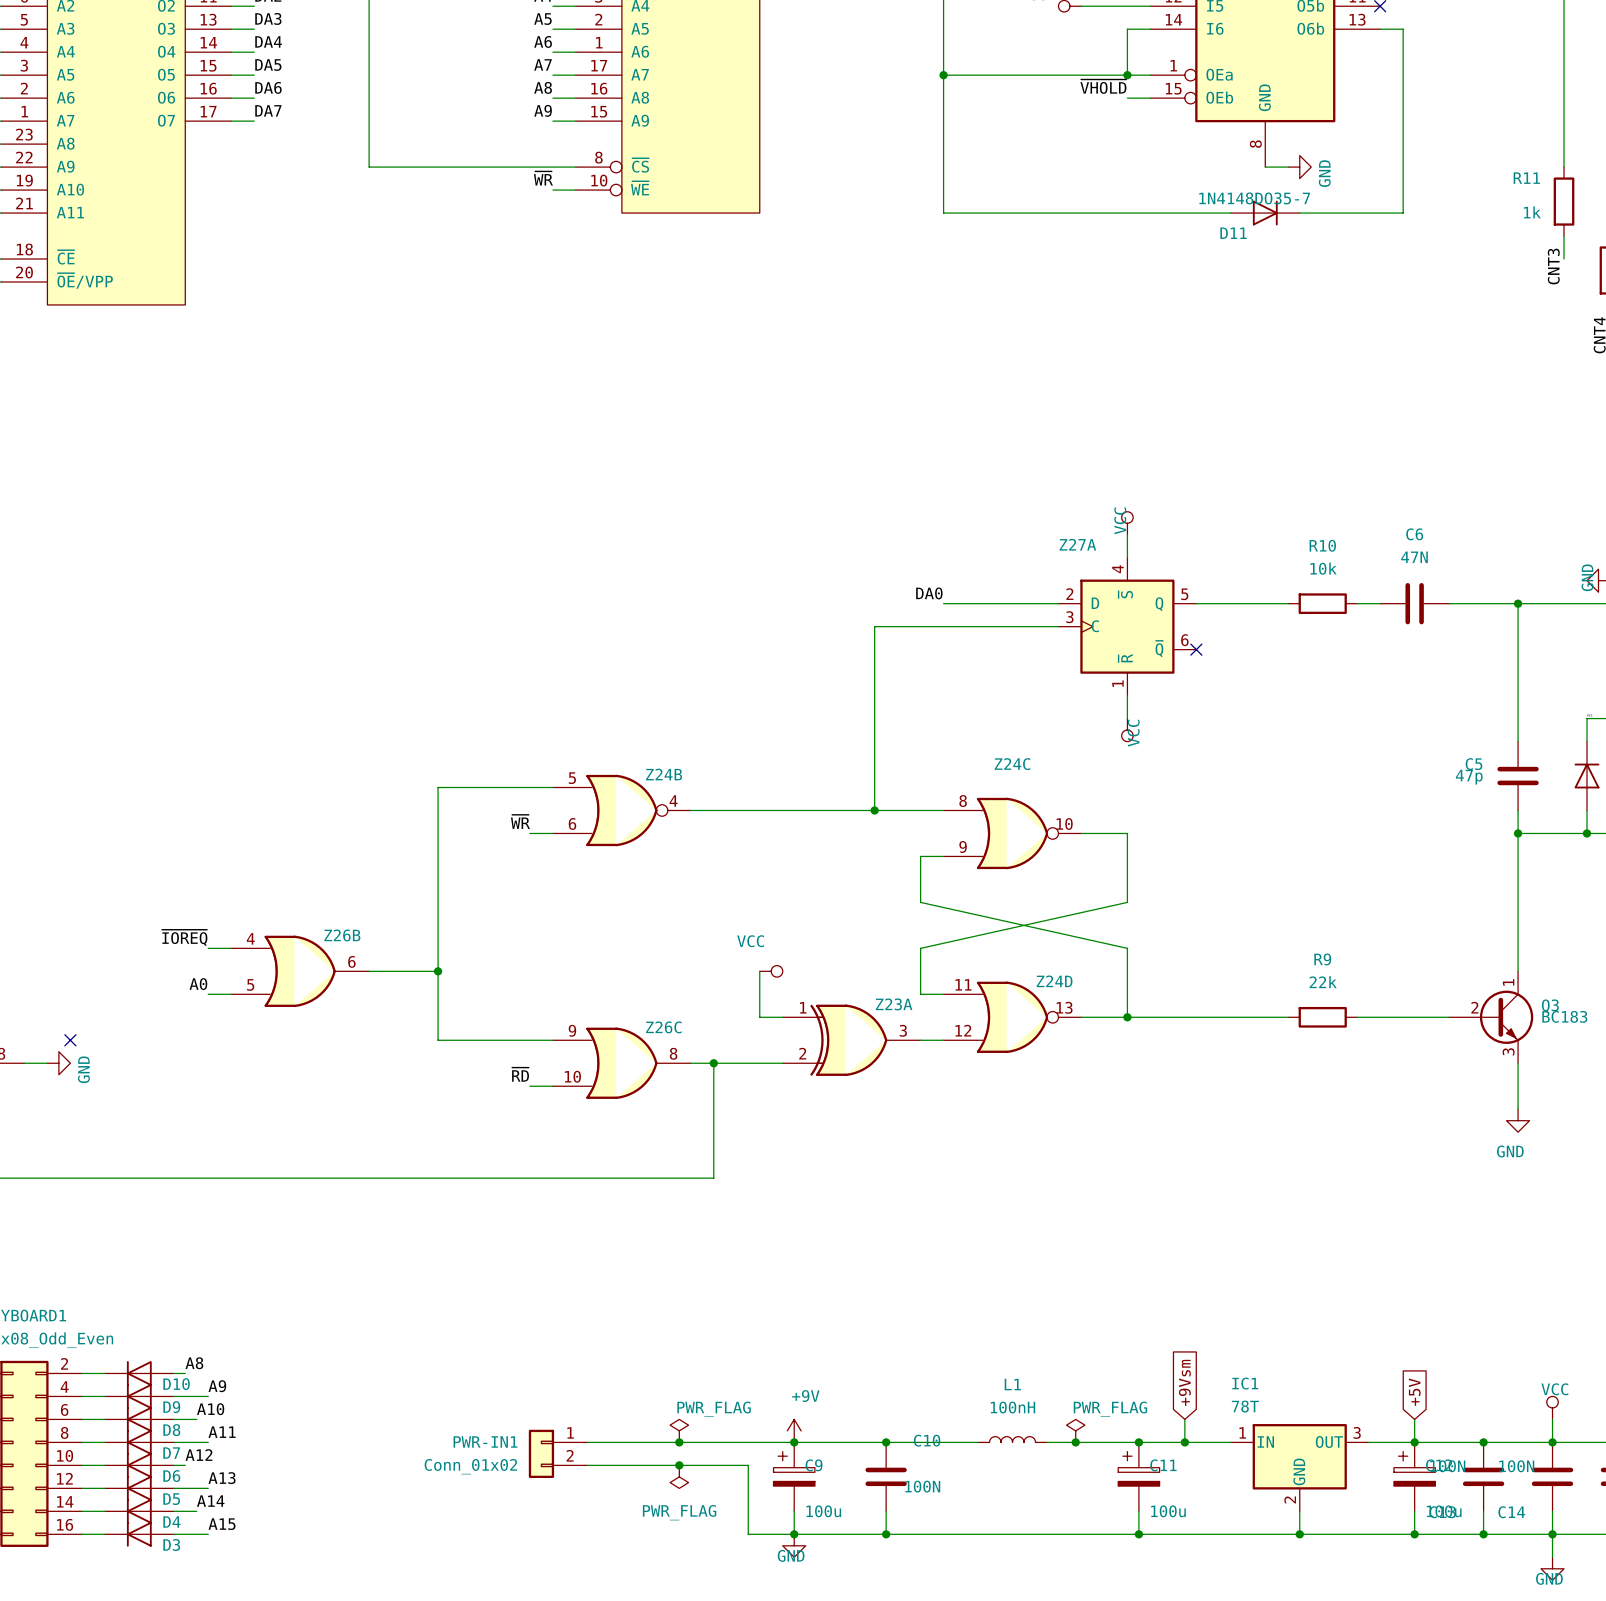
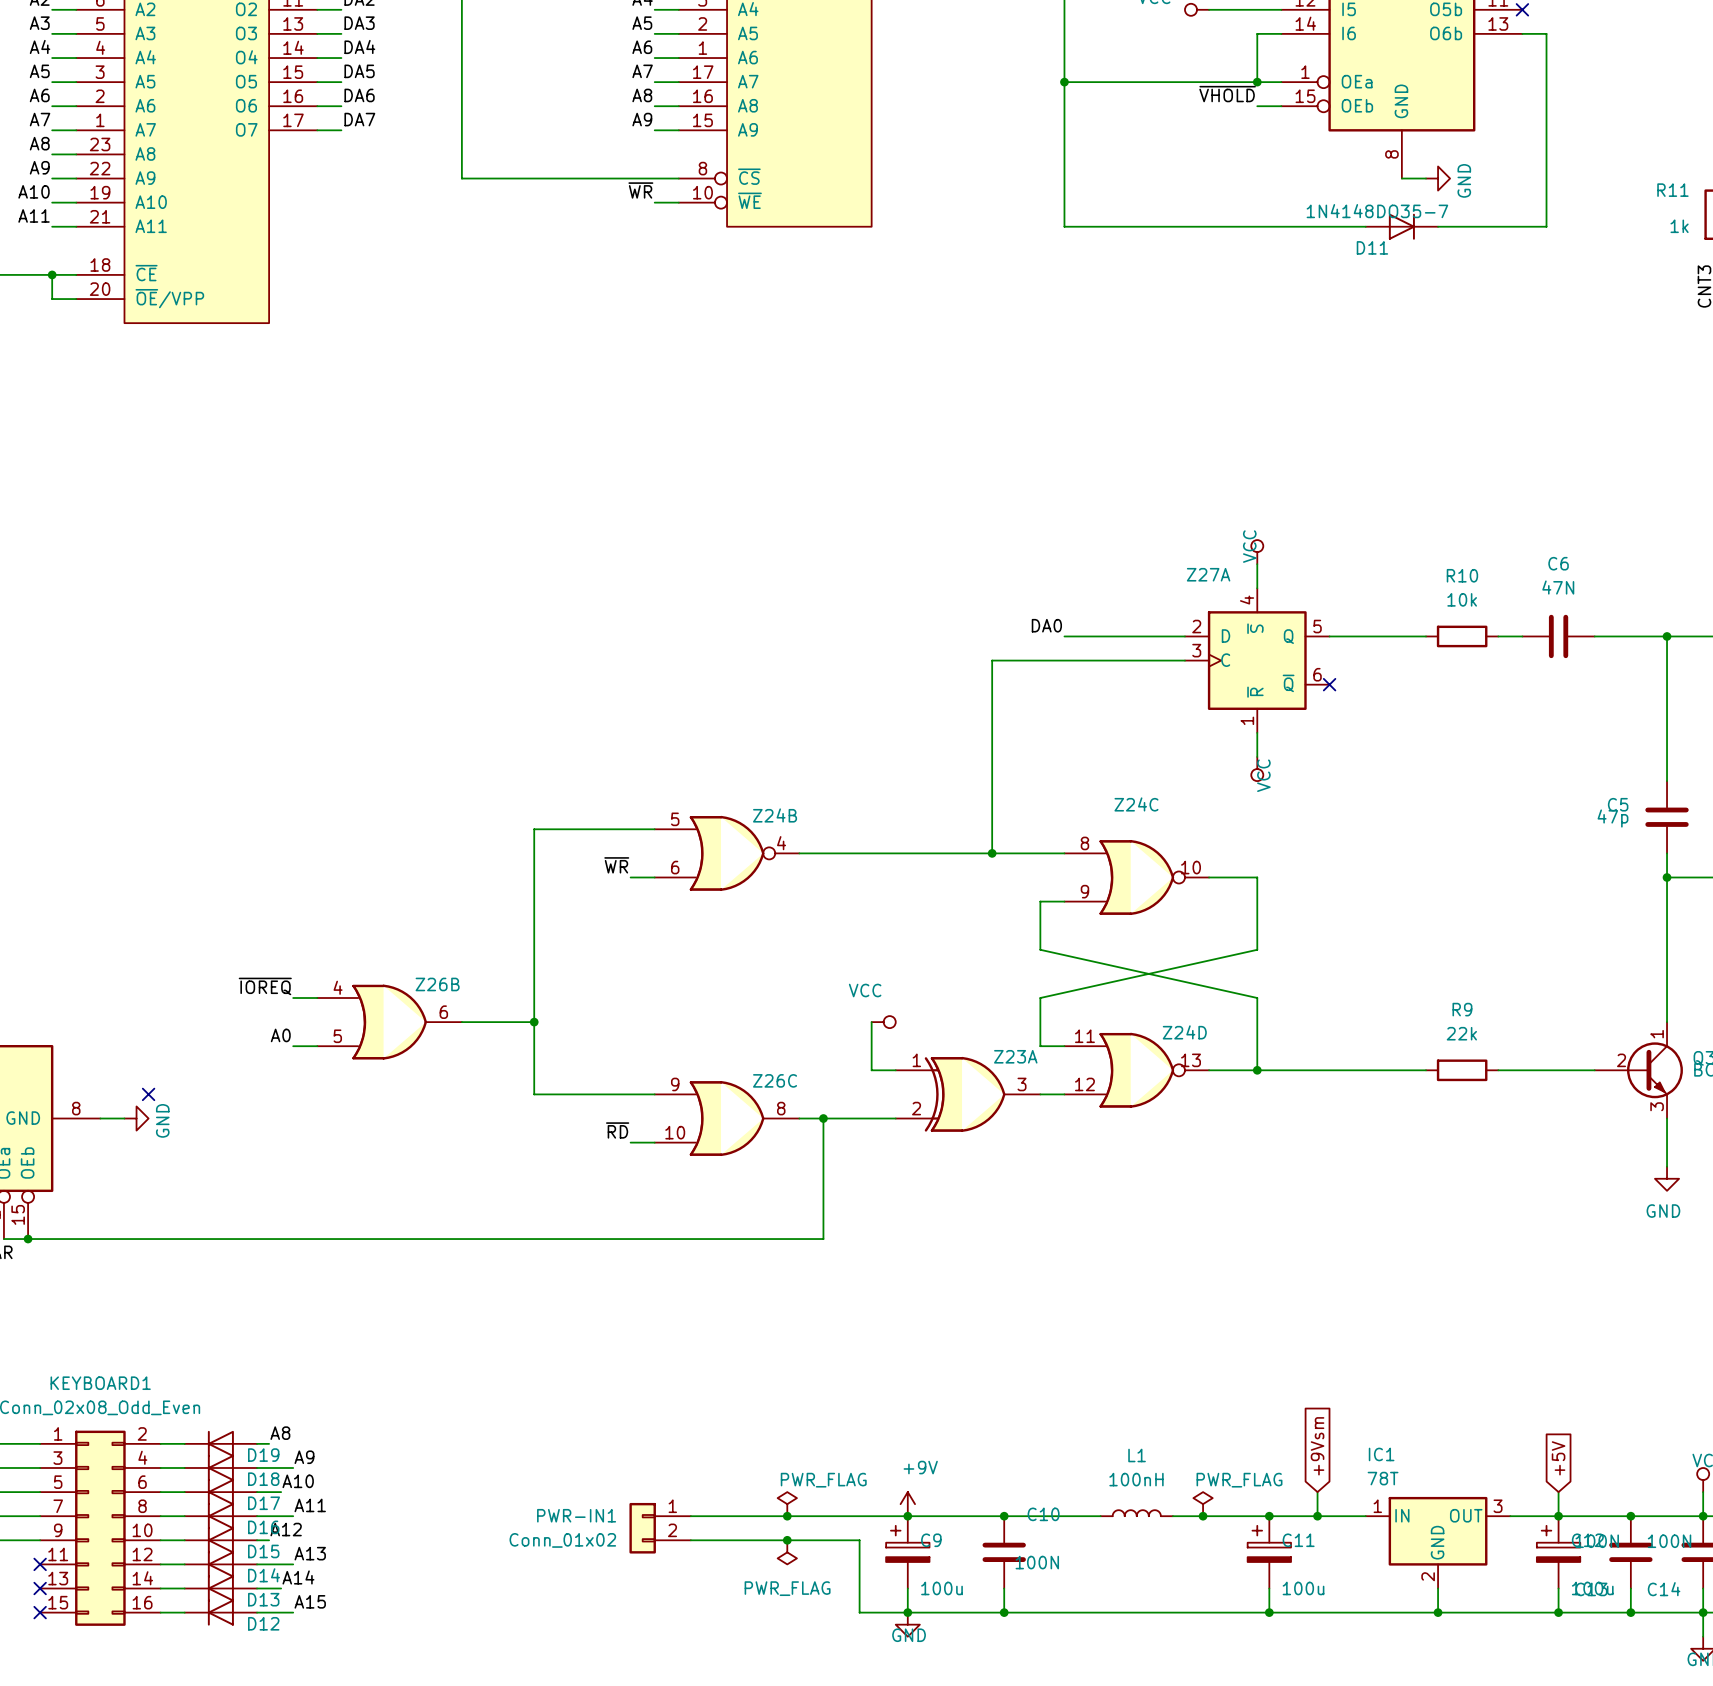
D10 name: D10 (176, 1384) -> D19 (263, 1455)
D9 name: D9 (171, 1407) -> D18 (263, 1479)
D8 name: D8 (171, 1430) -> D17 (264, 1503)
D7 name: D7 (171, 1453) -> D16 (263, 1527)
D6 name: D6 (171, 1476) -> D15 (263, 1551)
D5 name: D5 (171, 1499) -> D14 (264, 1575)
D4 name: D4 (171, 1522) -> D13 (263, 1599)
D3 name: D3 (171, 1544) -> D12 (263, 1623)

